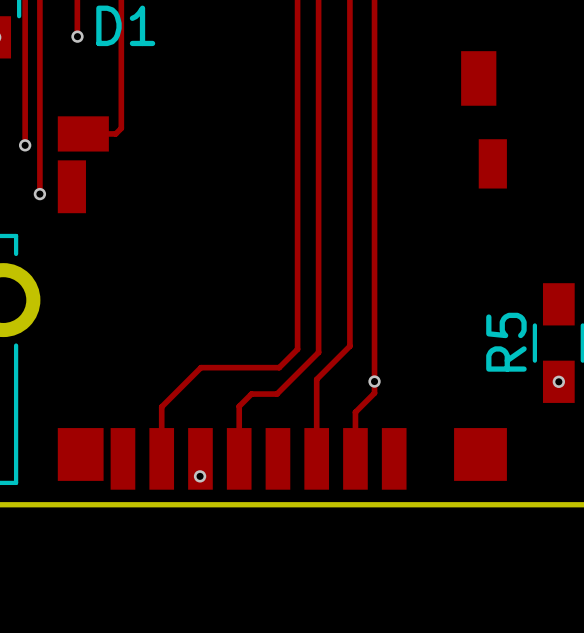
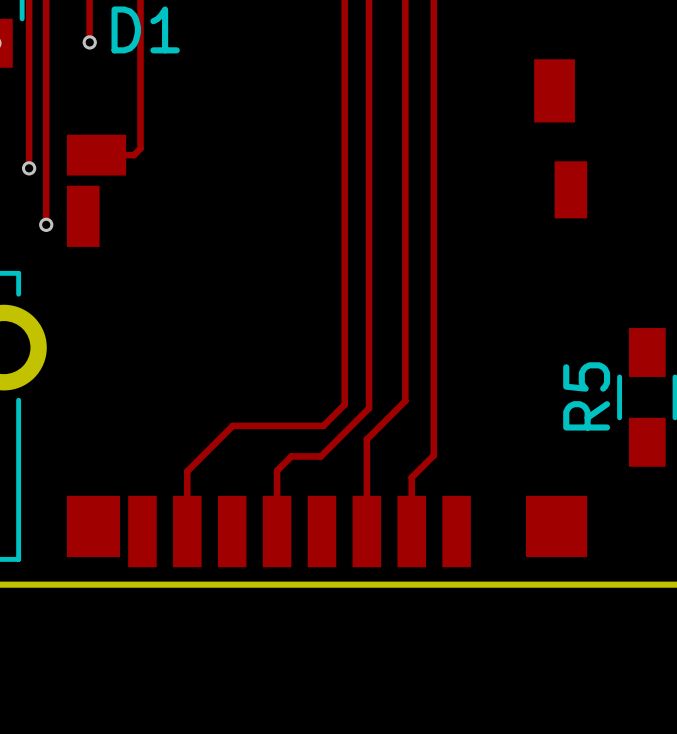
via: (374, 381) -> none
via: (558, 381) -> none
via: (200, 476) -> none

